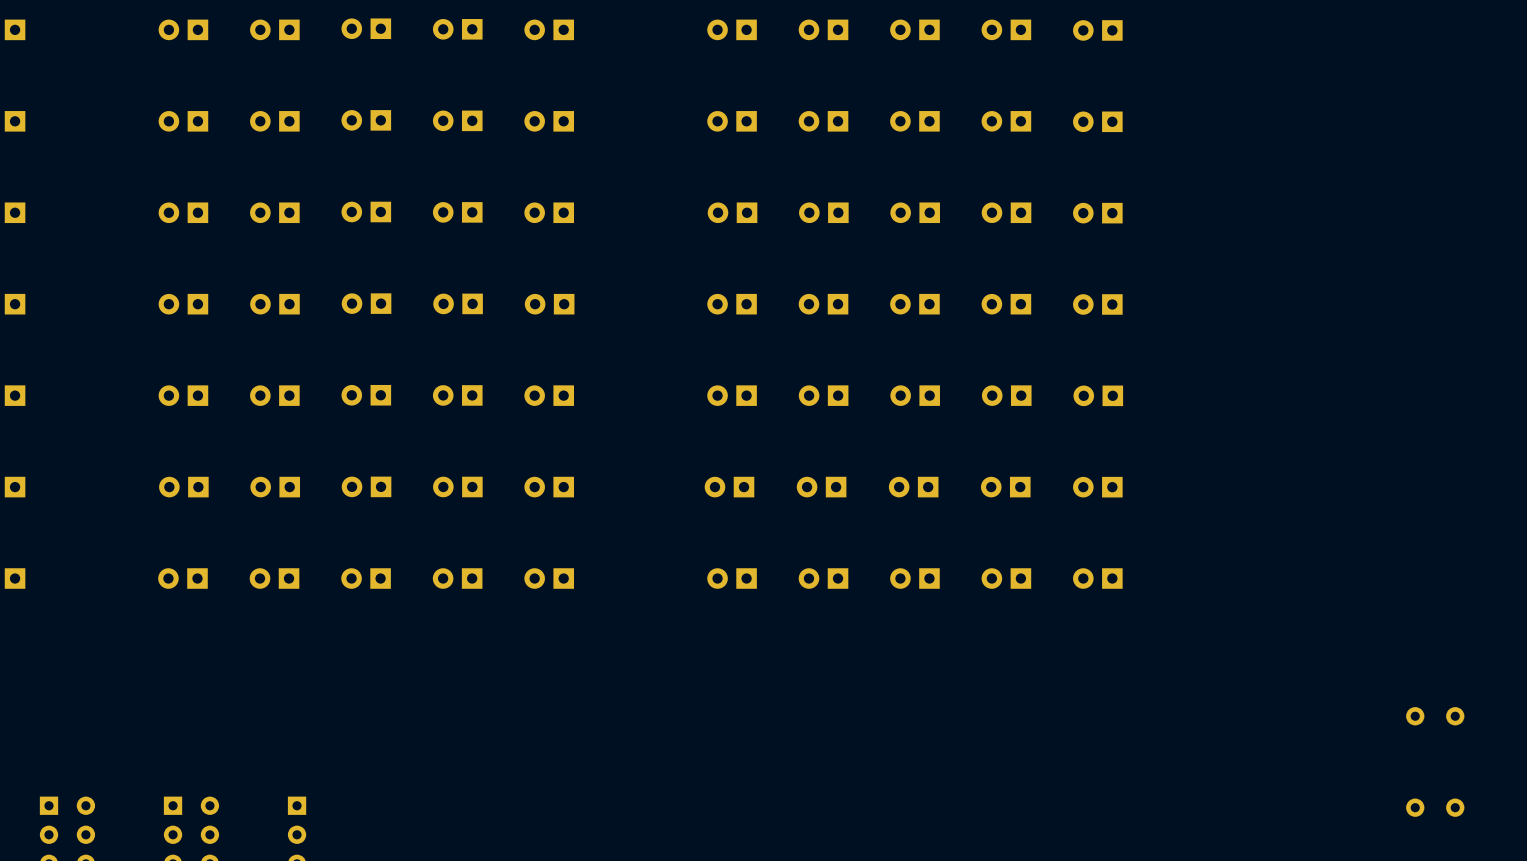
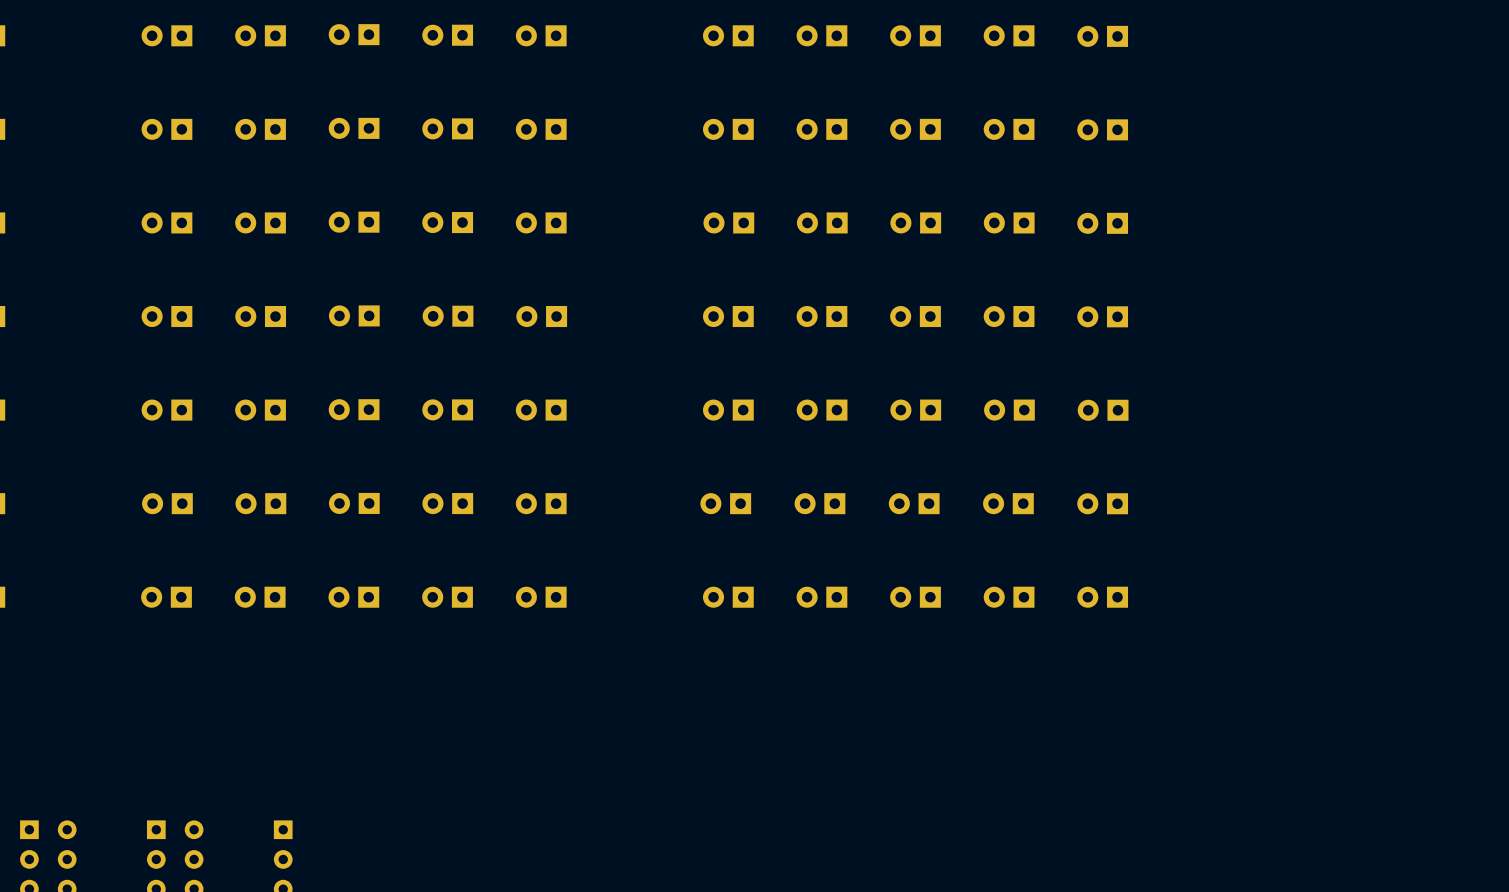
part: (1435, 716) -> none
part: (1435, 807) -> none

